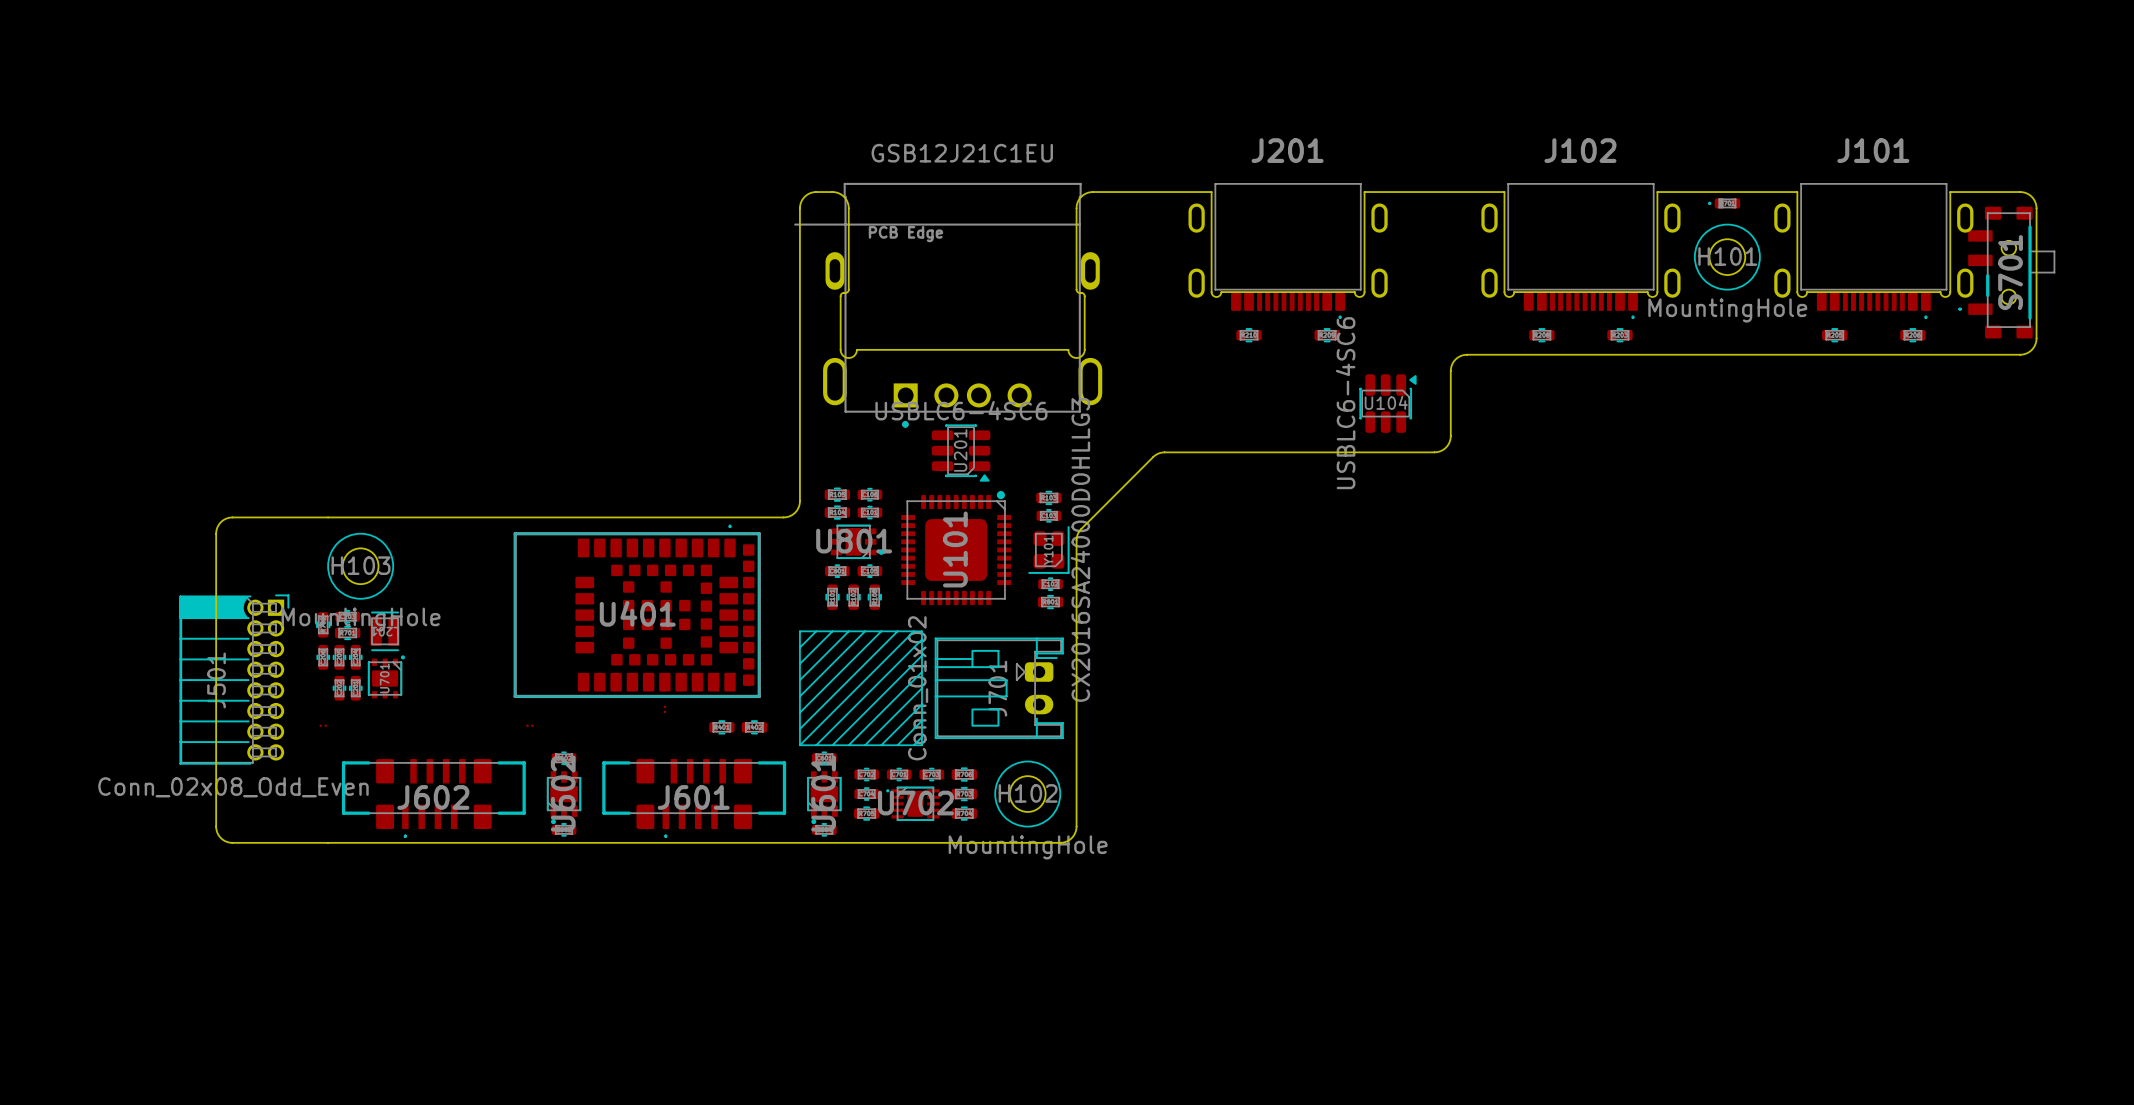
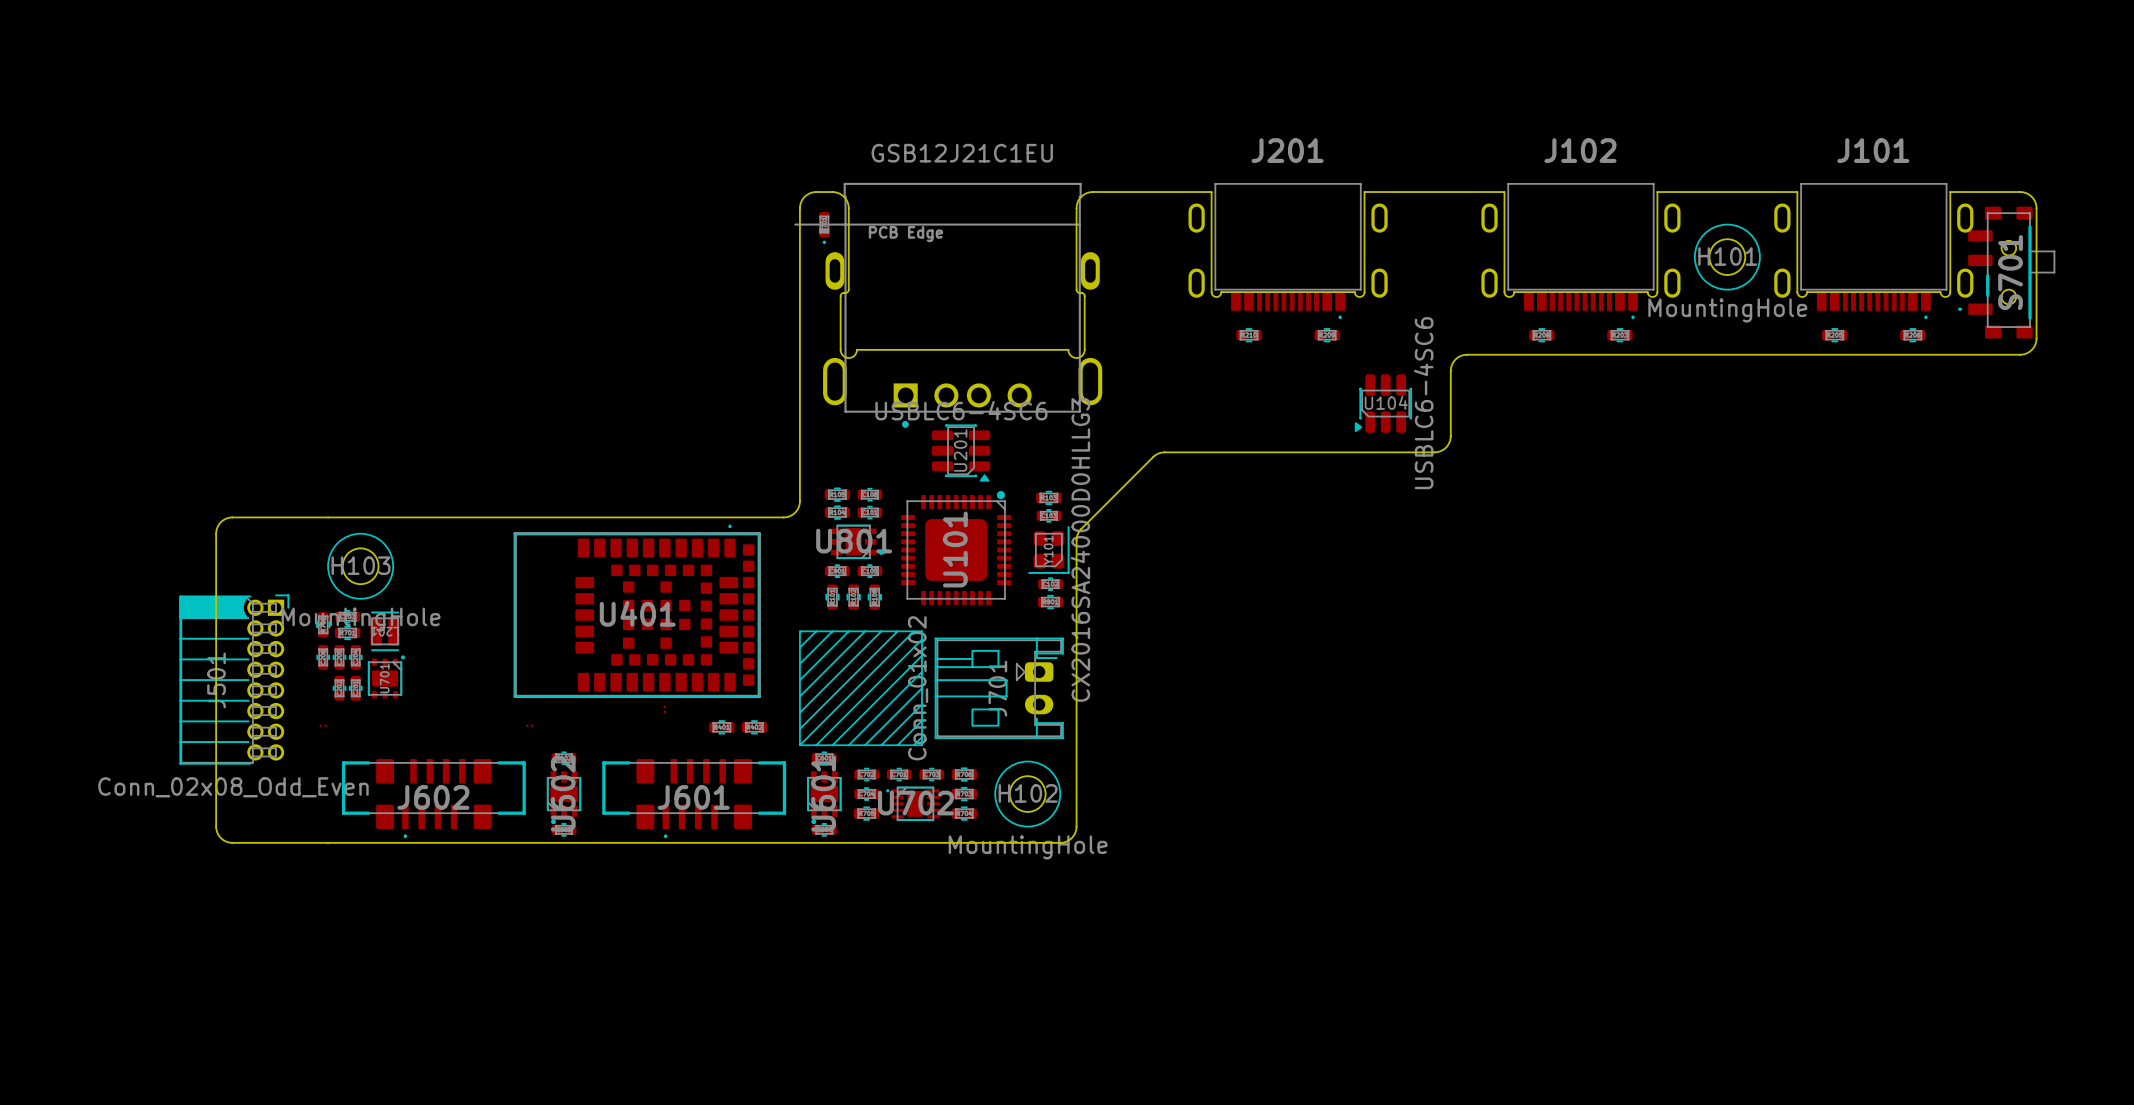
part rotation: 0° (1724, 203) -> 90° counterclockwise (824, 227)
part position: (1724, 203) -> (824, 227)
U104 rotation: 0° (1387, 403) -> 180° (1383, 403)

